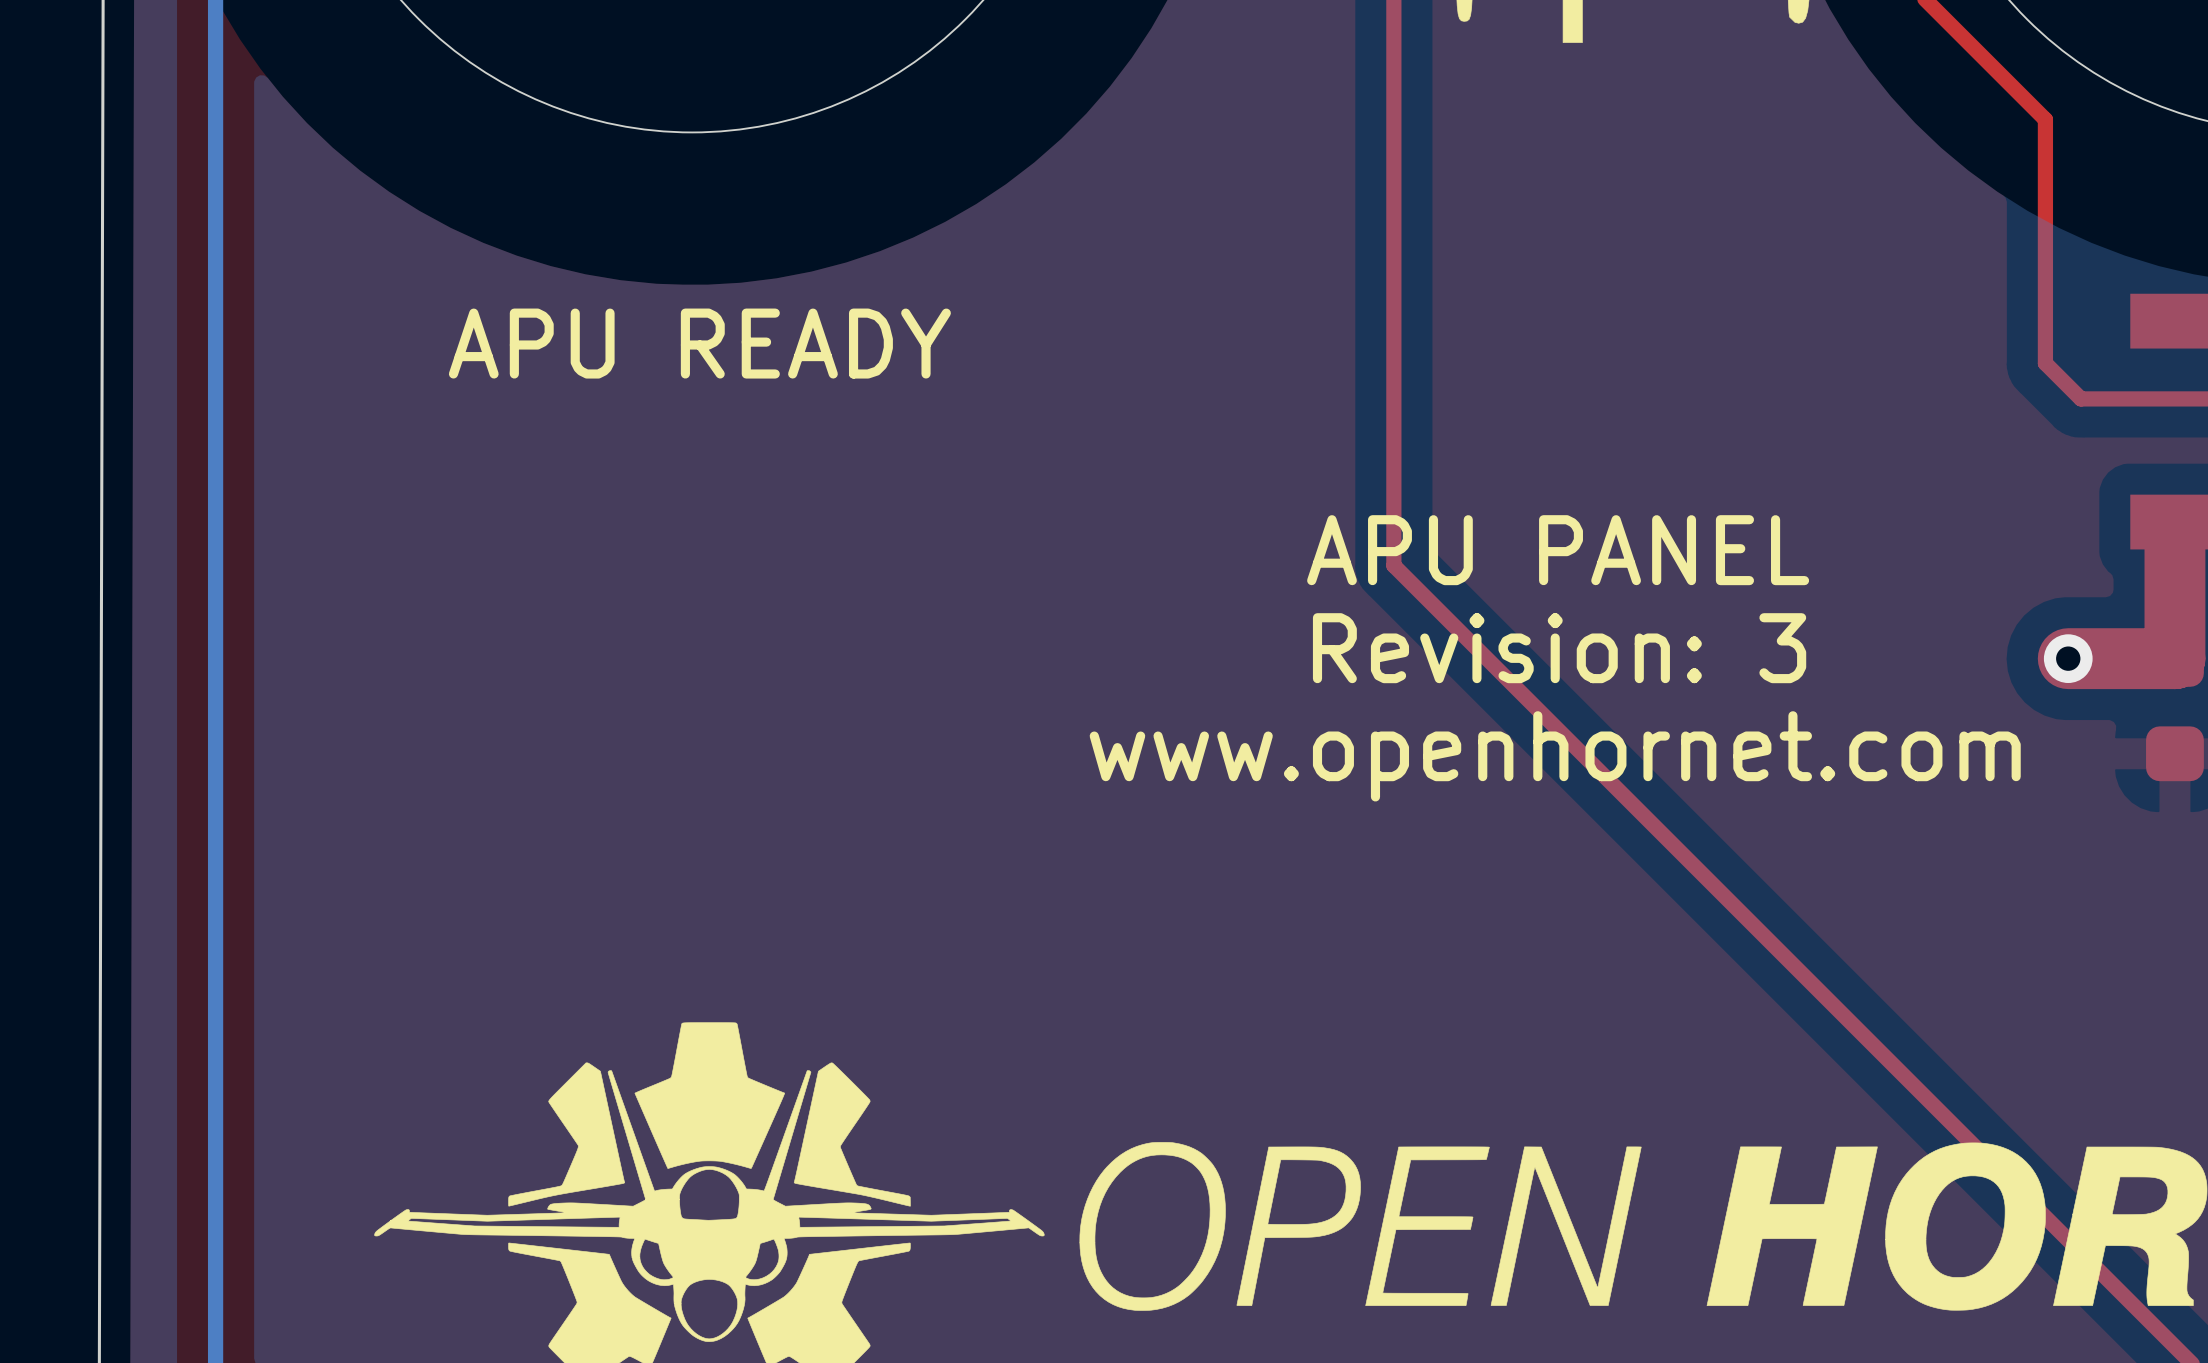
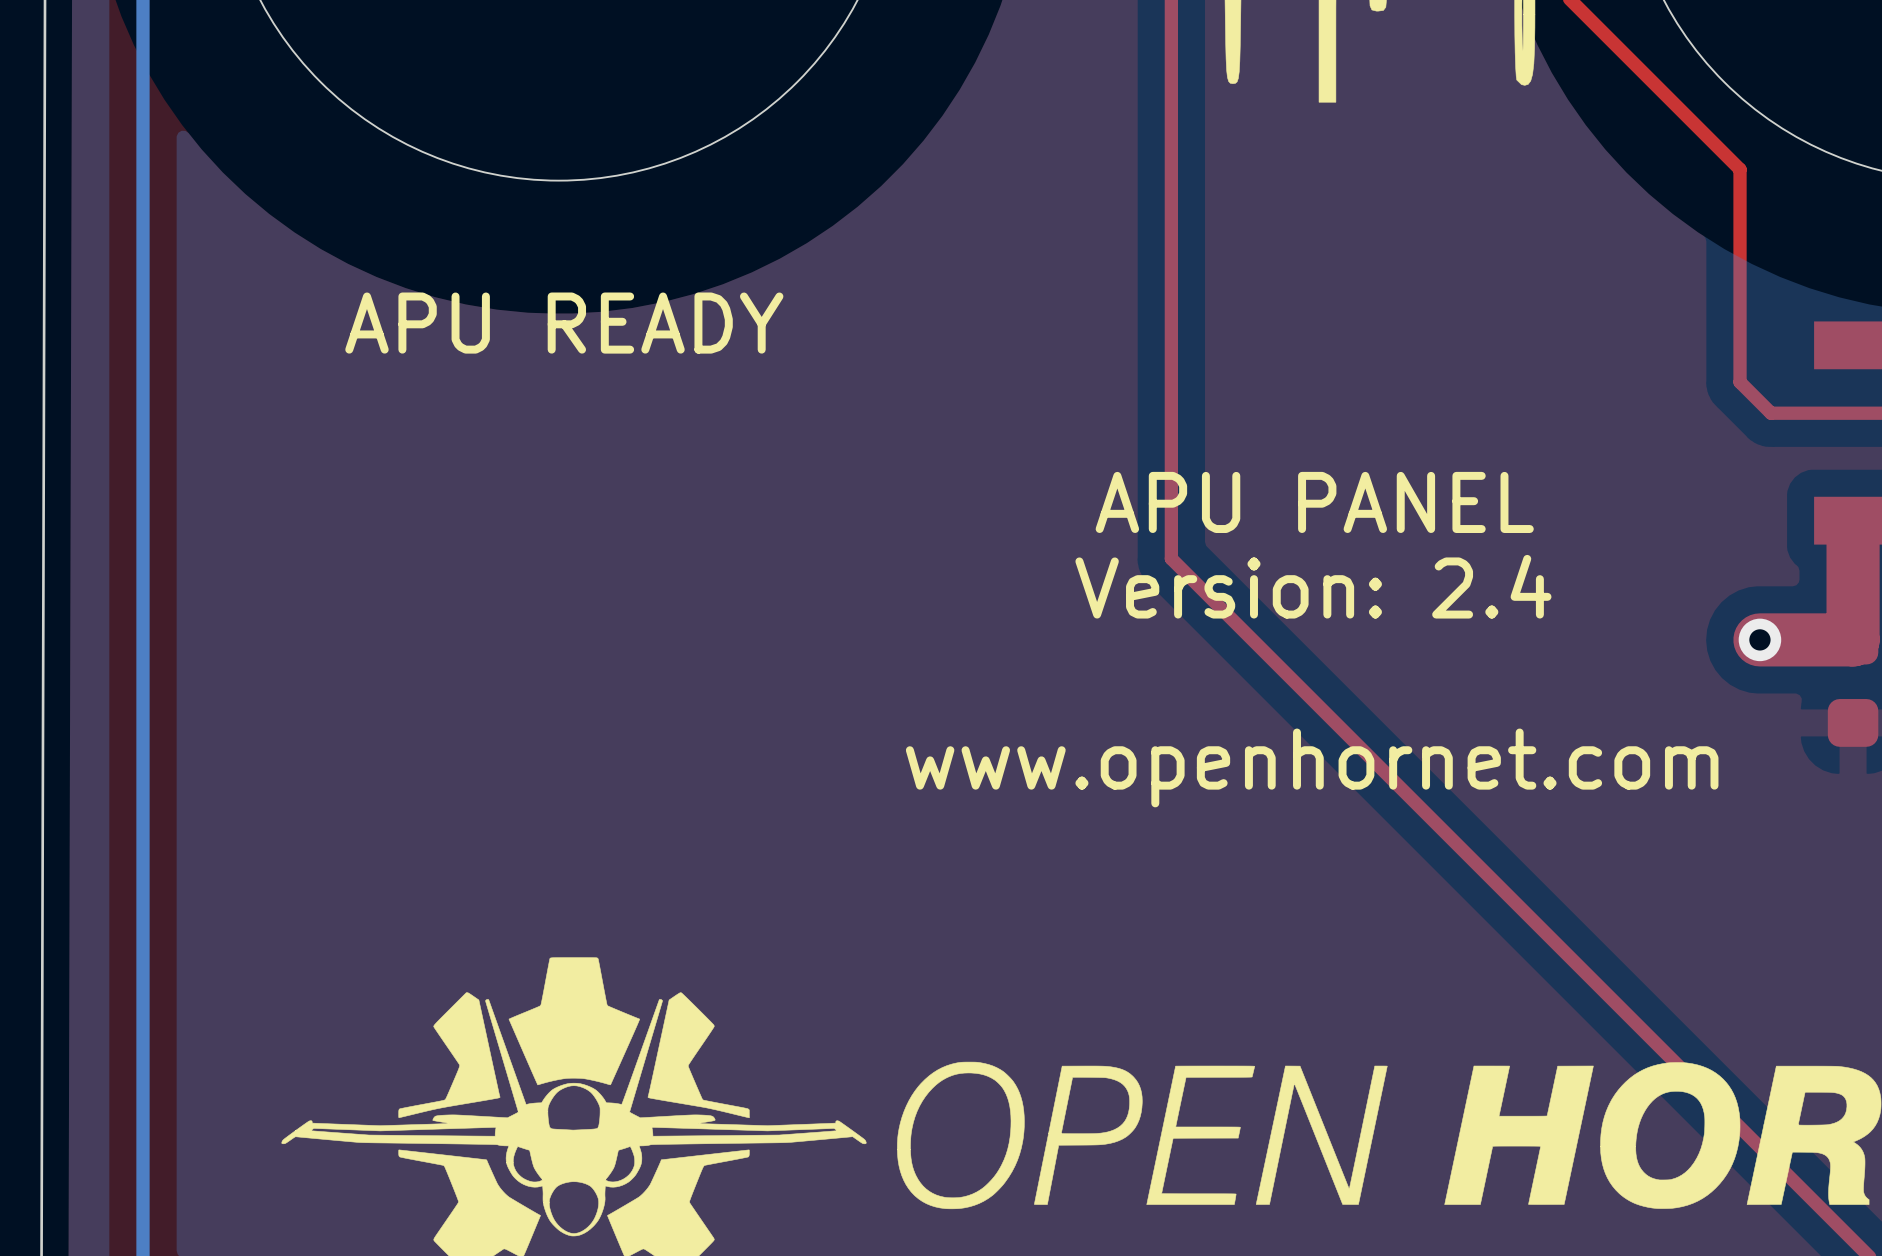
text position: APU READY (699, 343) -> APU READY (564, 323)
text position: APU PANEL (1558, 550) -> APU PANEL (1314, 502)
text: Revision: 3 (1559, 648) -> Version: 2.4 (1313, 586)
text position: www.openhornet.com (1555, 756) -> www.openhornet.com (1312, 767)

